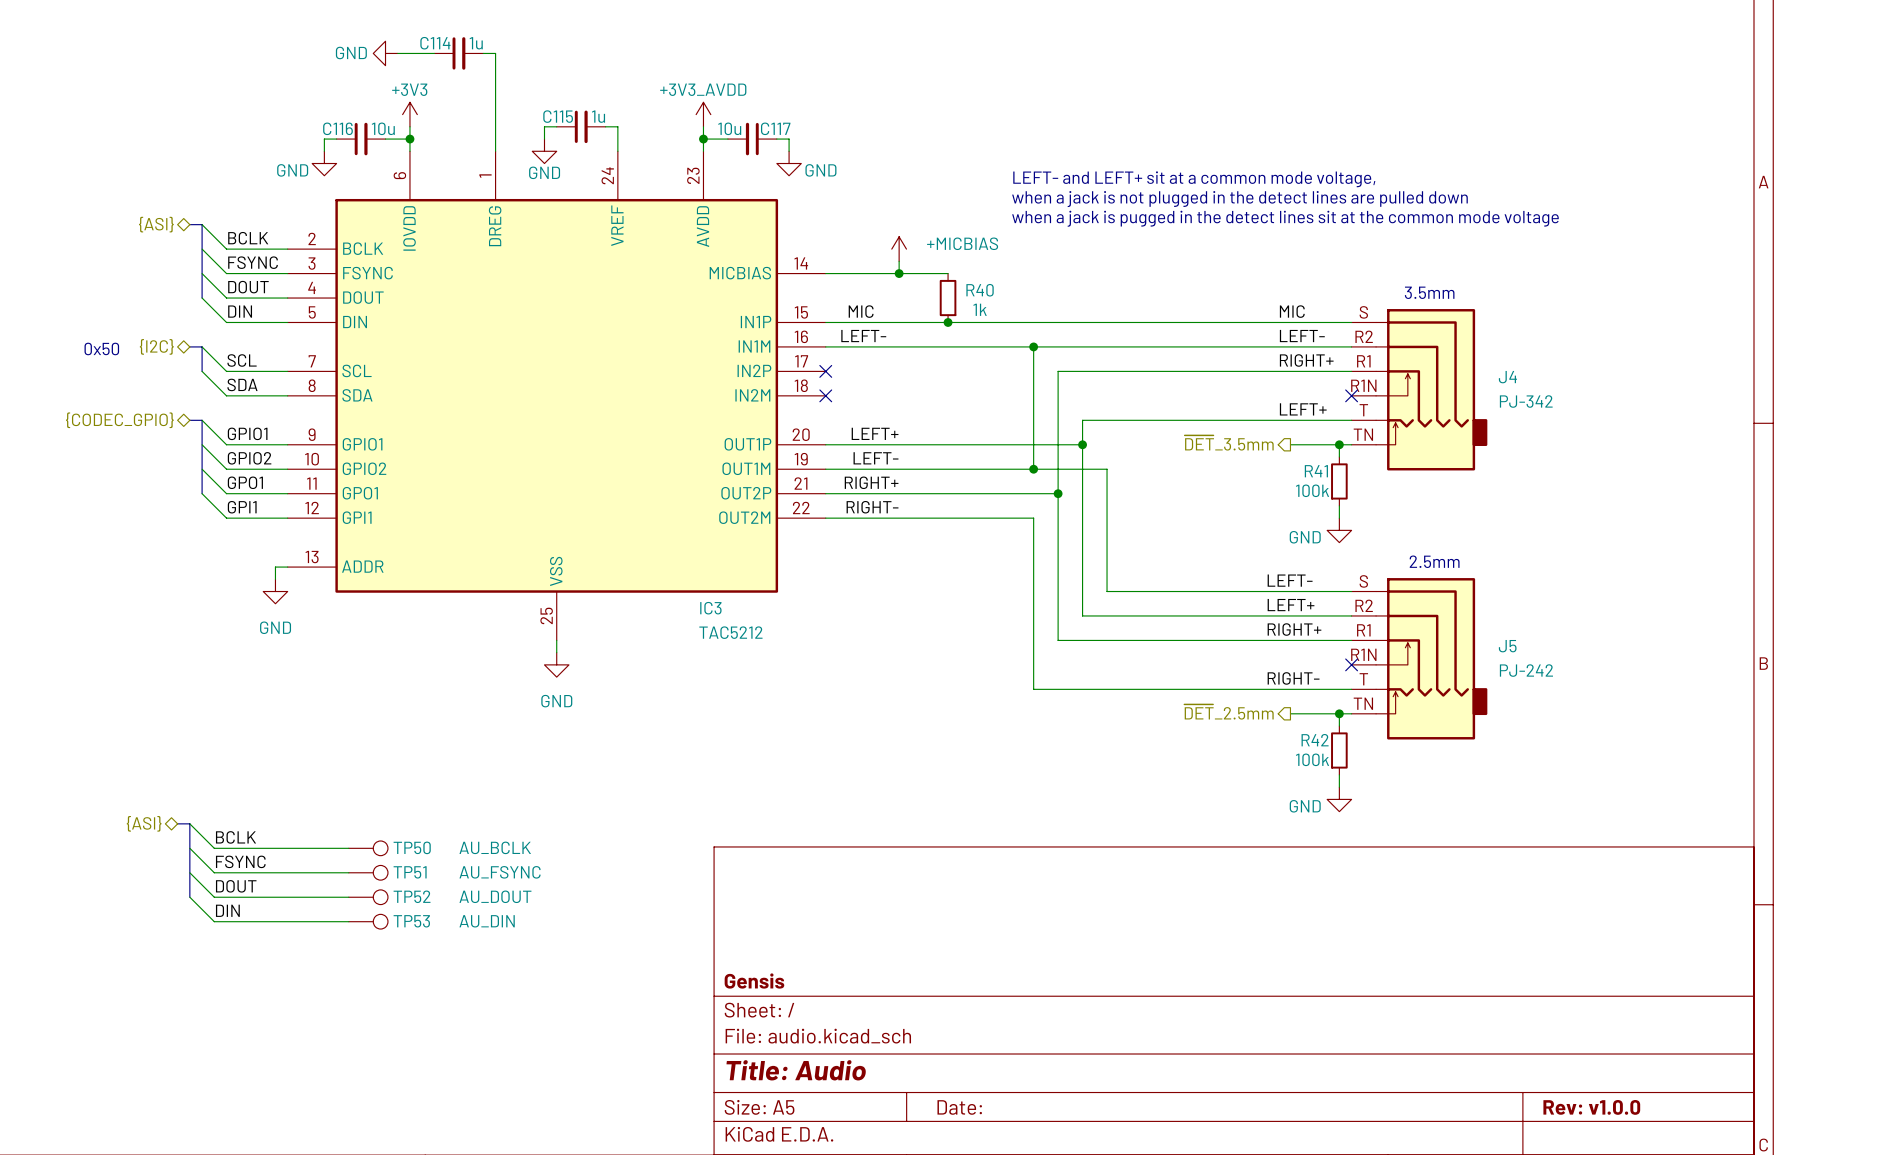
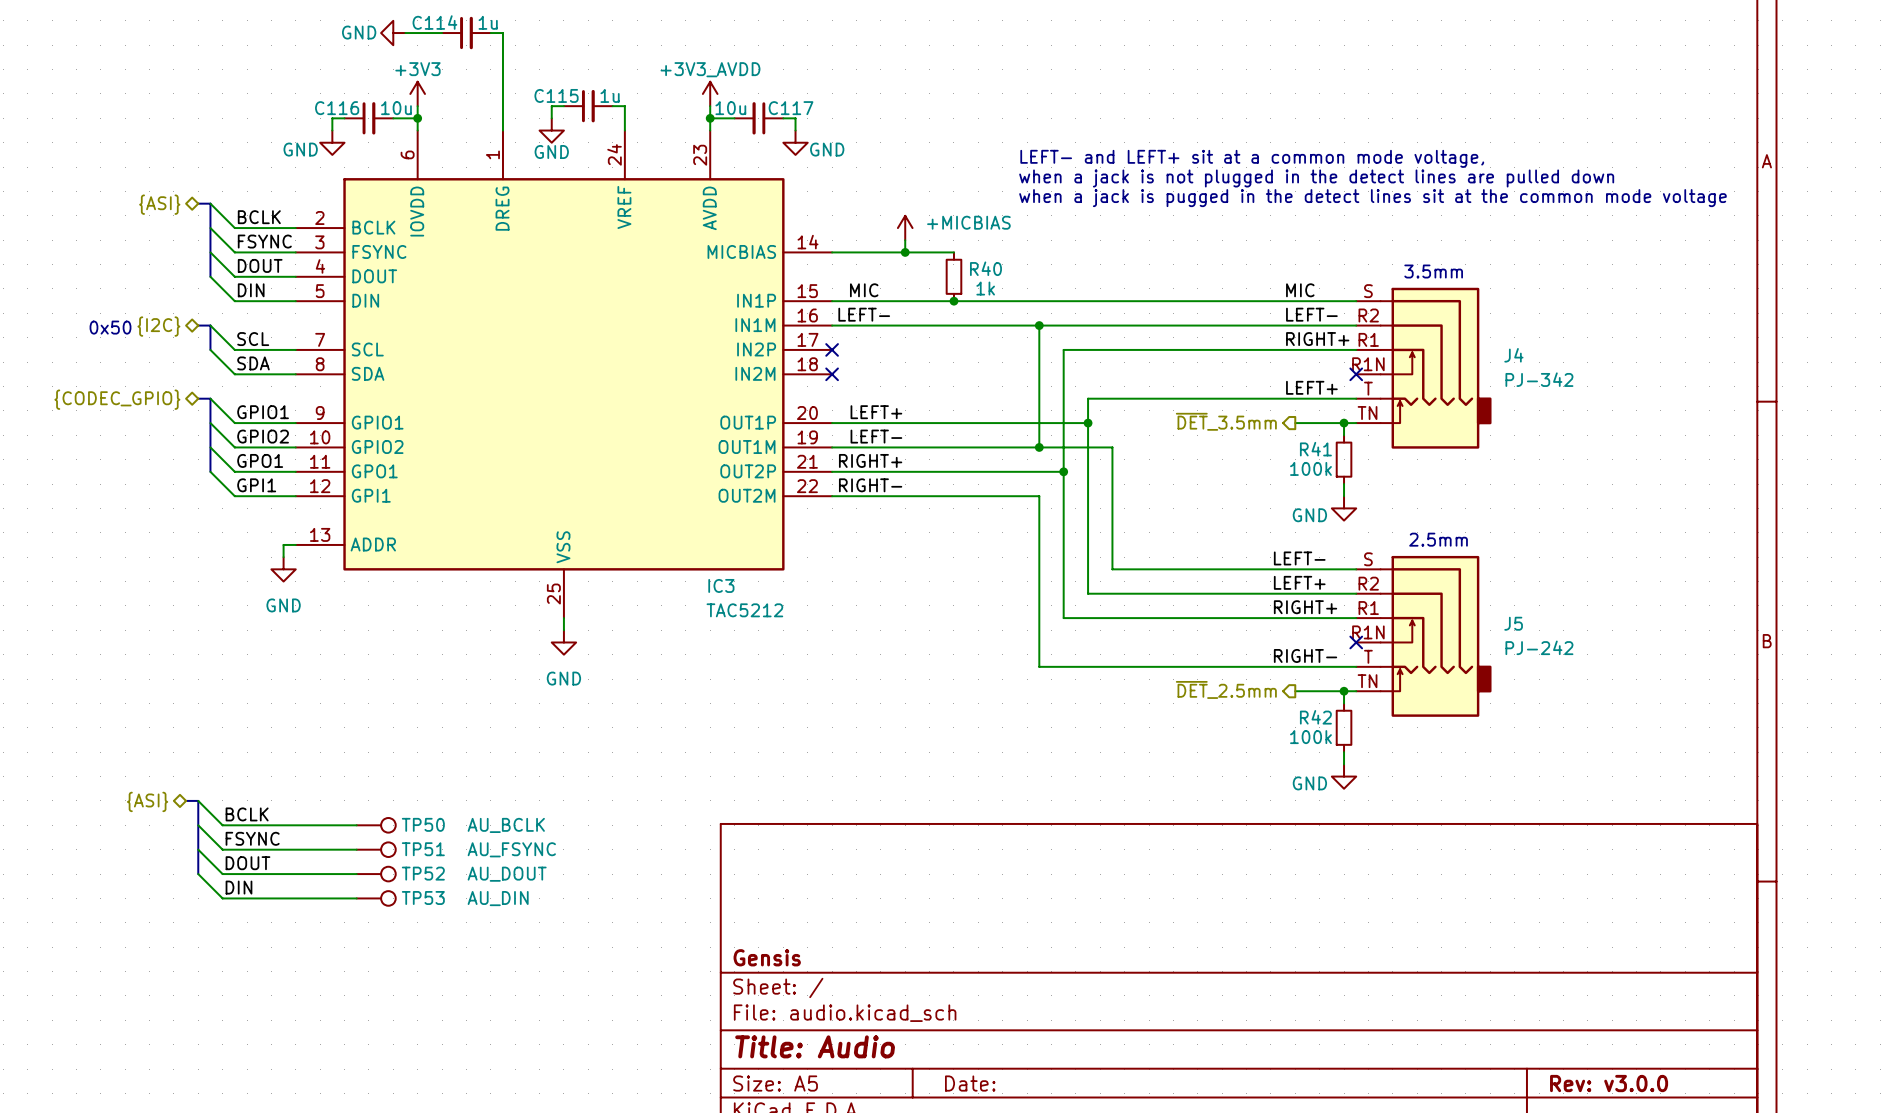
title block: Rev: v1.0.0 (1591, 1107) -> Rev: v3.0.0 (1609, 1083)

